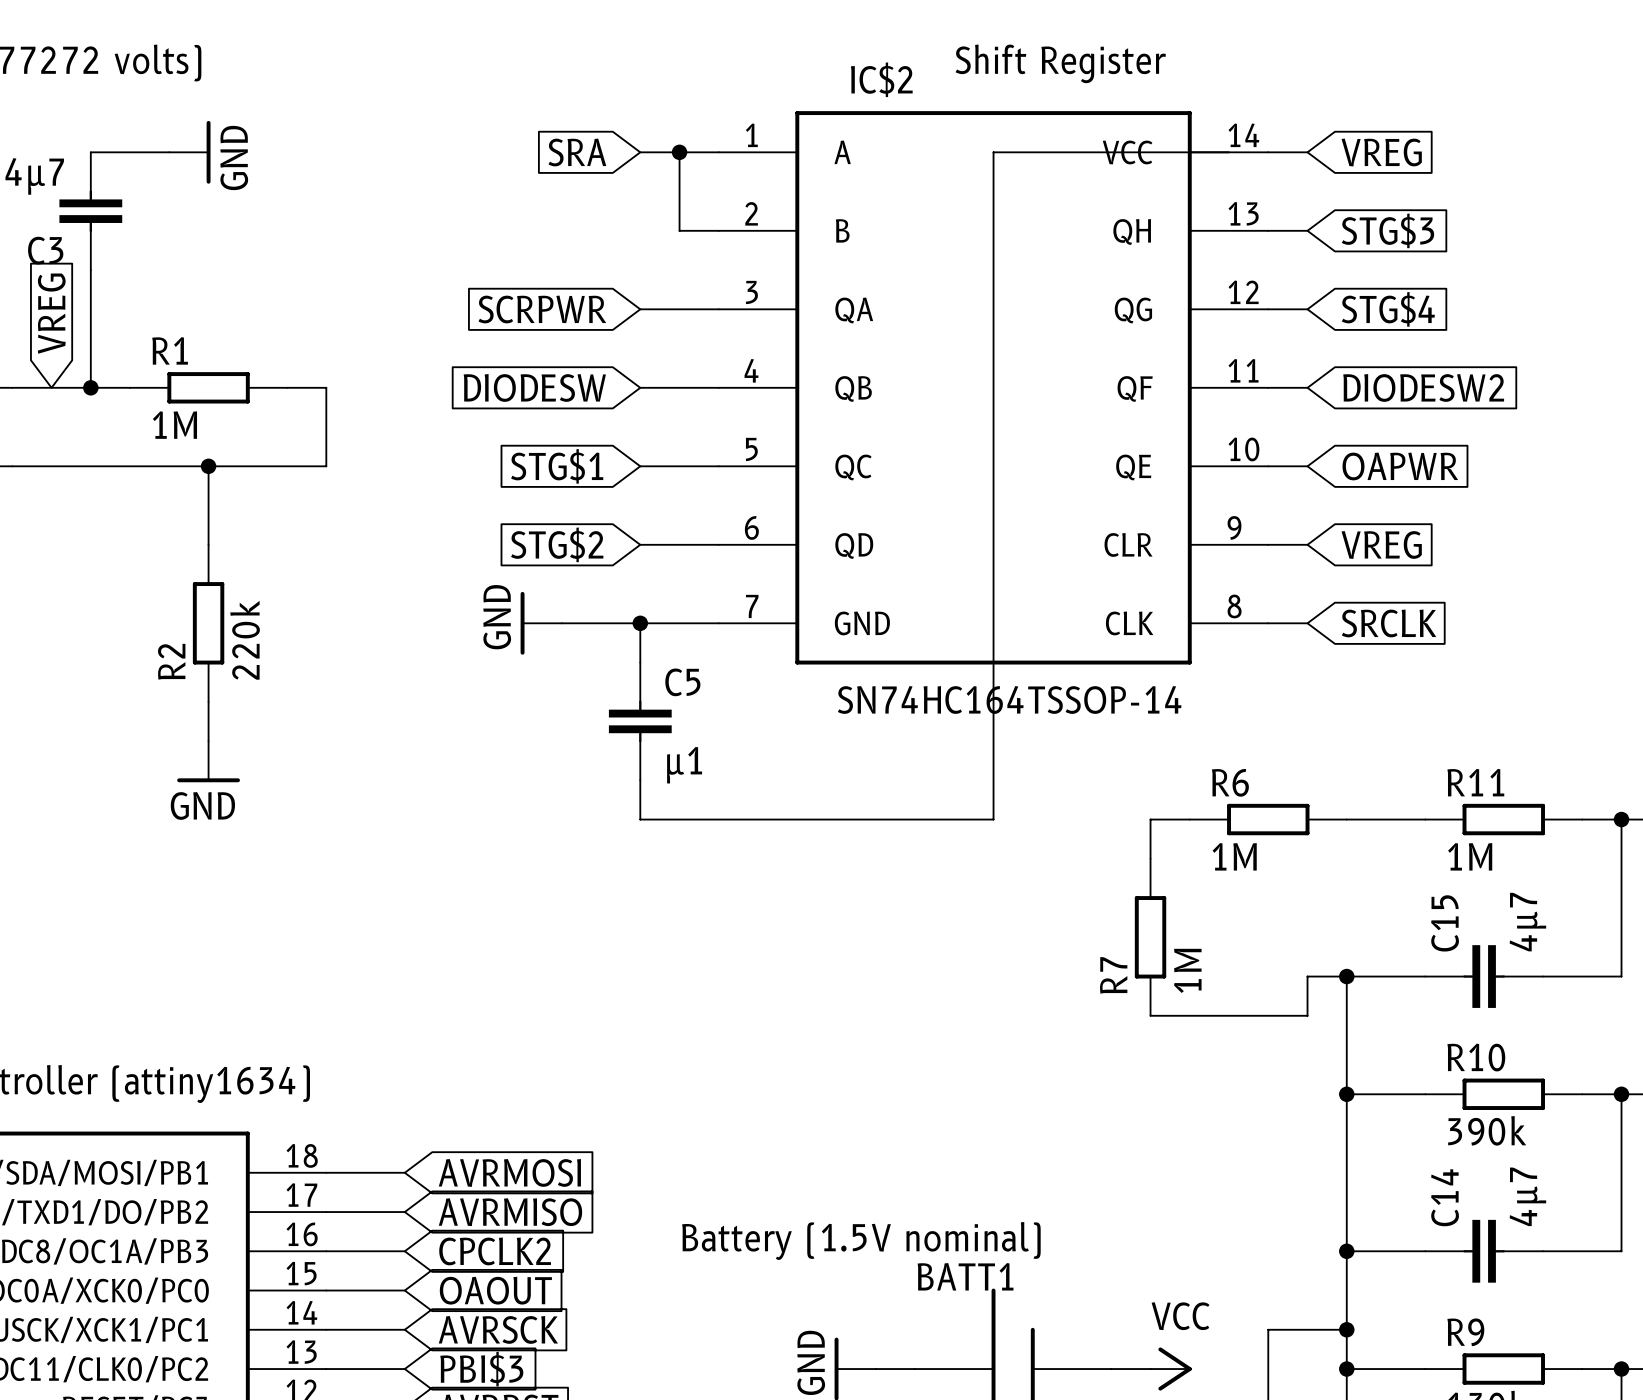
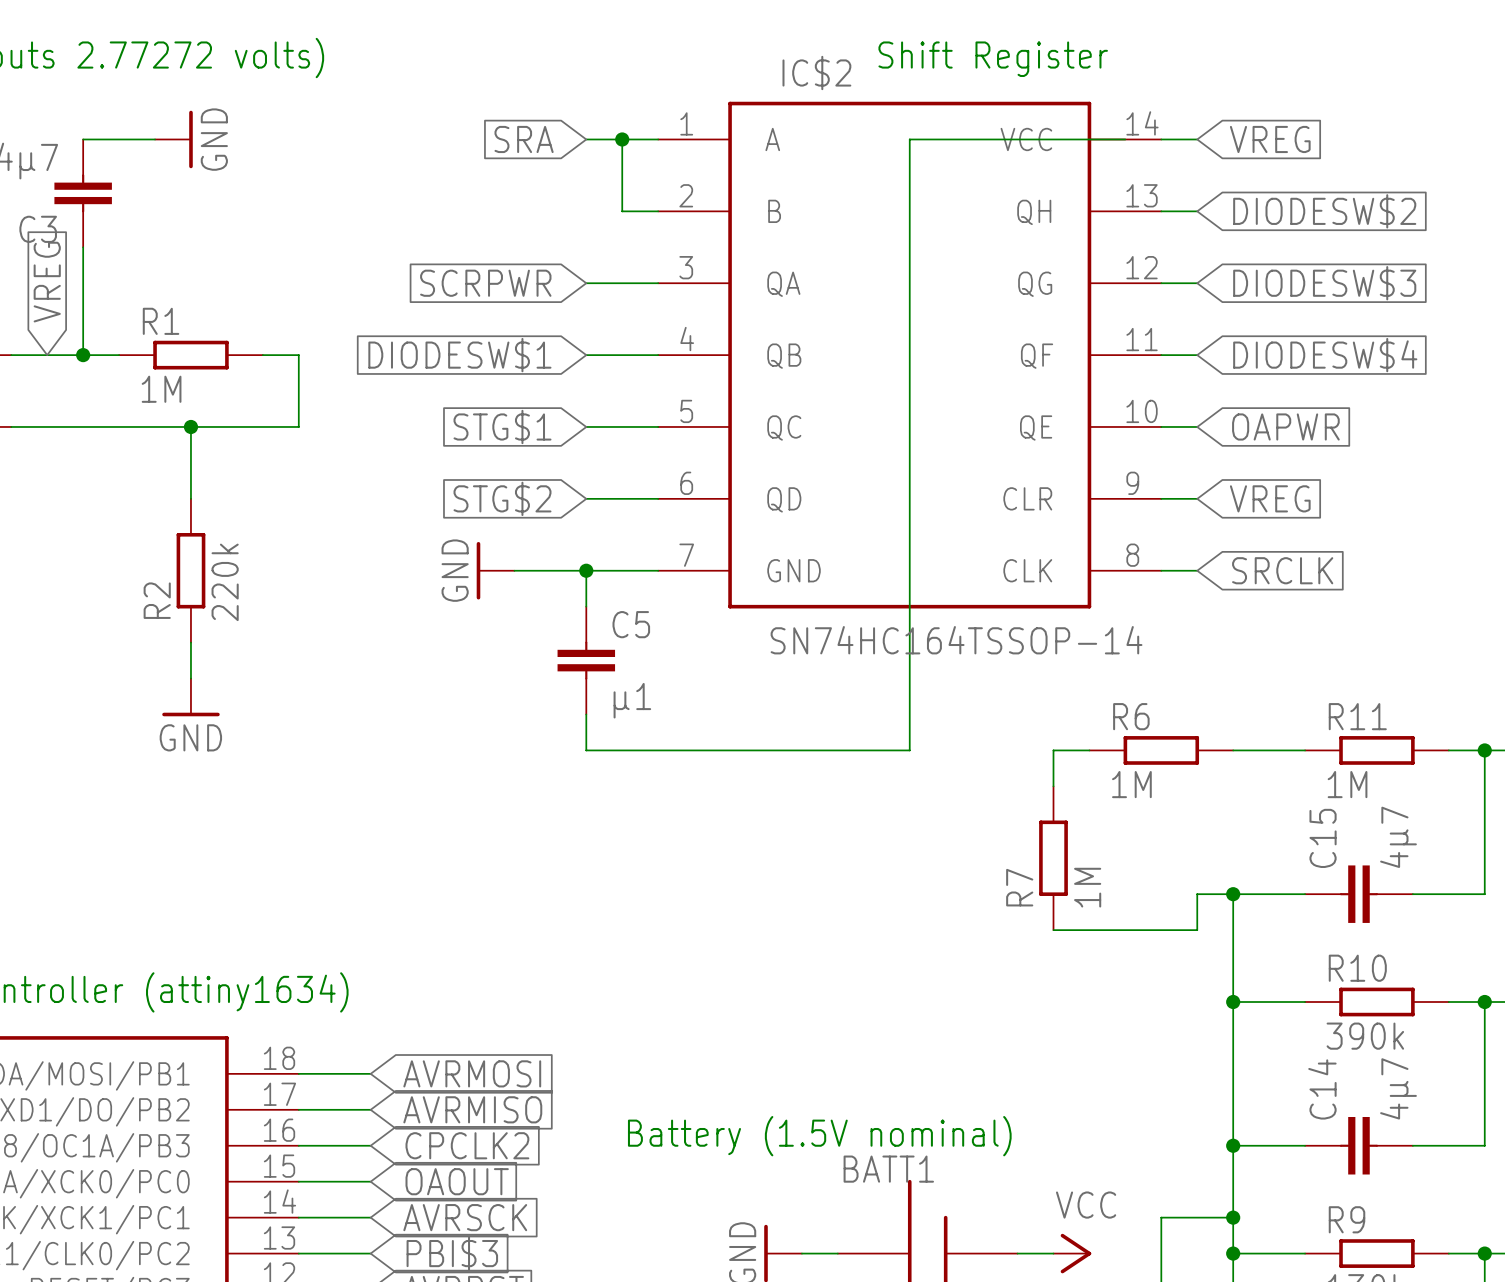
global label: STG$3 (1387, 230) -> DIODESW$2 (1324, 211)
global label: STG$4 (1388, 309) -> DIODESW$3 (1324, 283)
global label: DIODESW (534, 387) -> DIODESW$1 (459, 355)
global label: DIODESW2 (1423, 387) -> DIODESW$4 (1325, 355)

